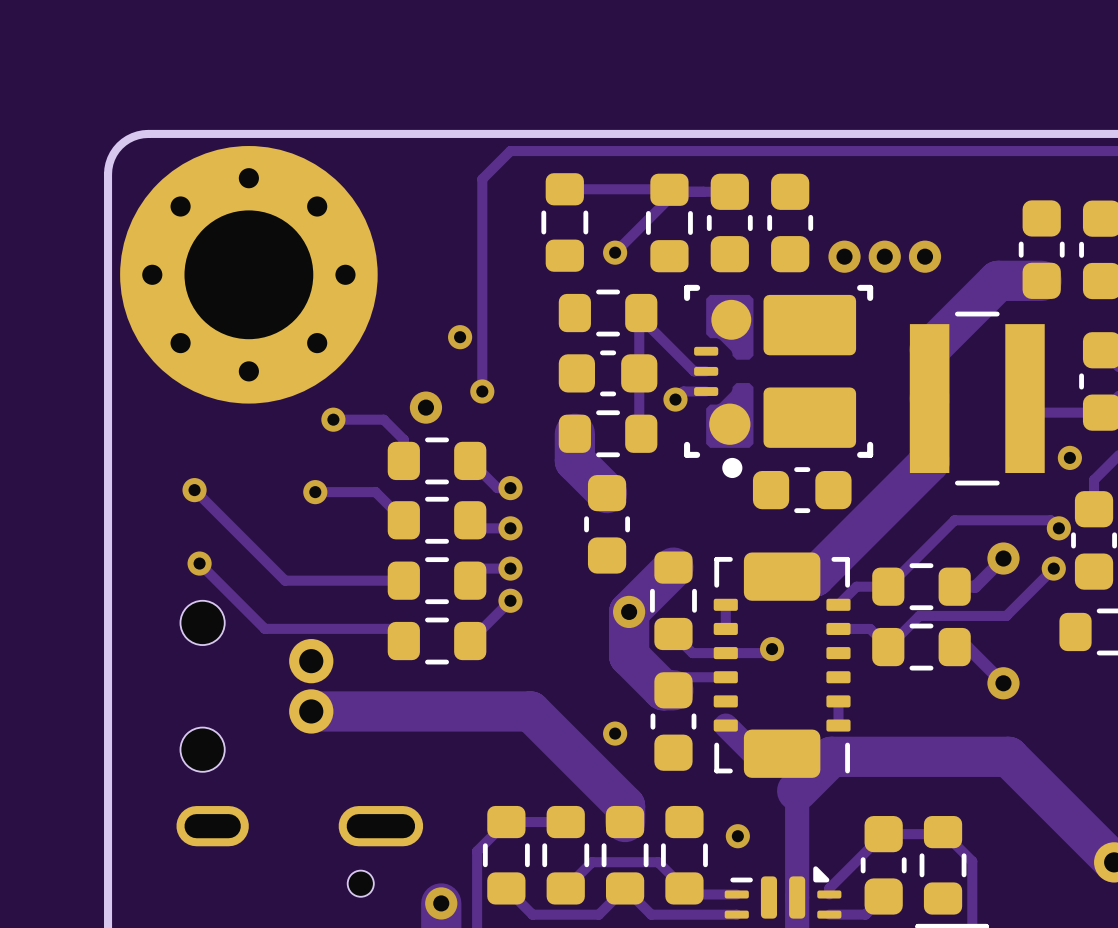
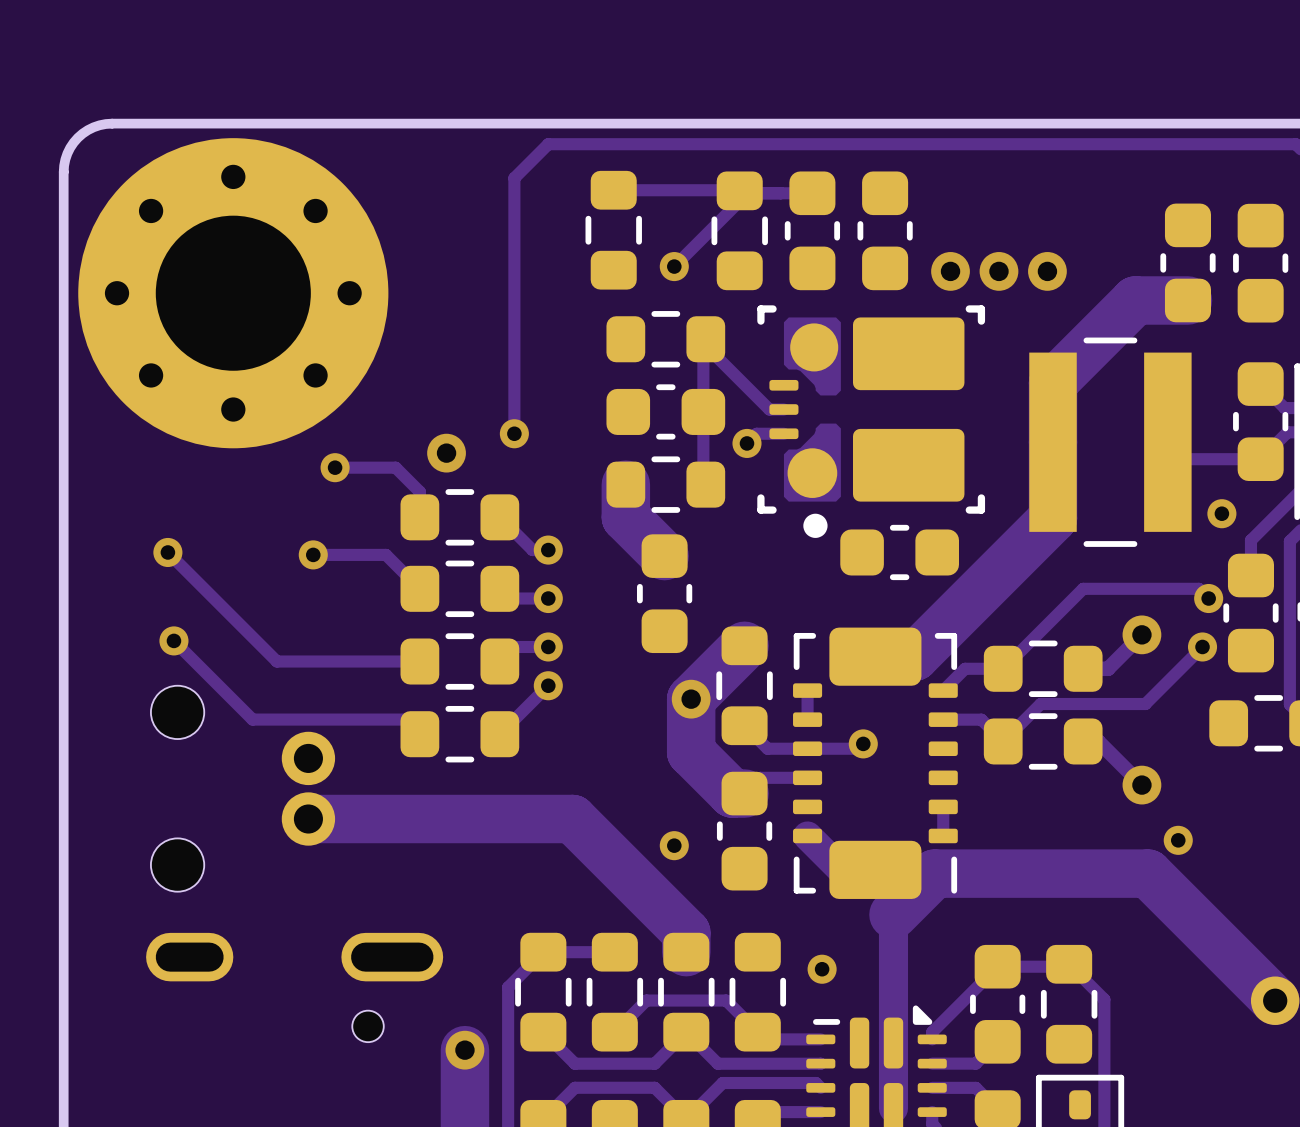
via: (460, 337) -> none
via: none -> (1178, 840)

